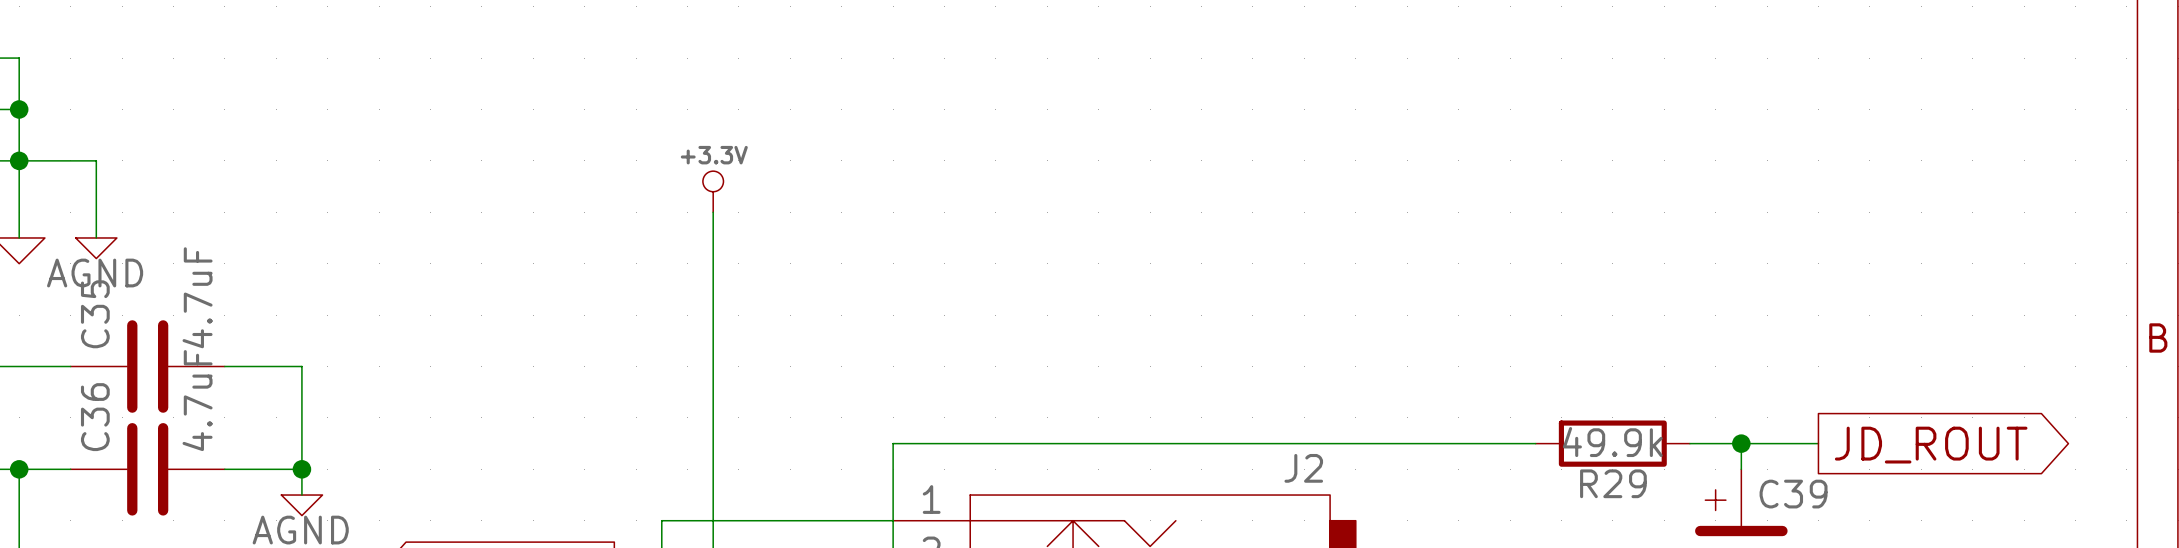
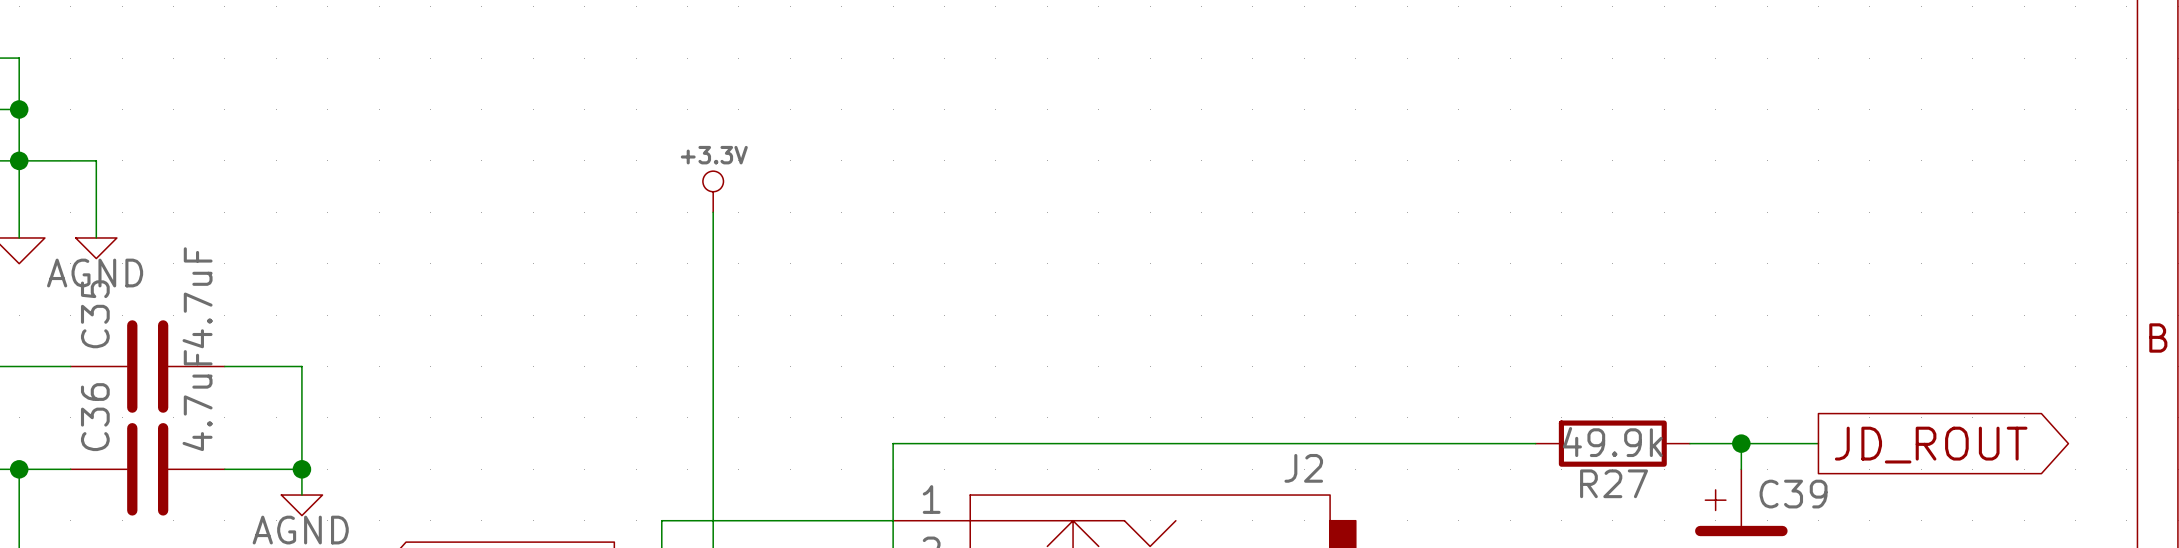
R29 name: R29 (1613, 483) -> R27 (1614, 483)

